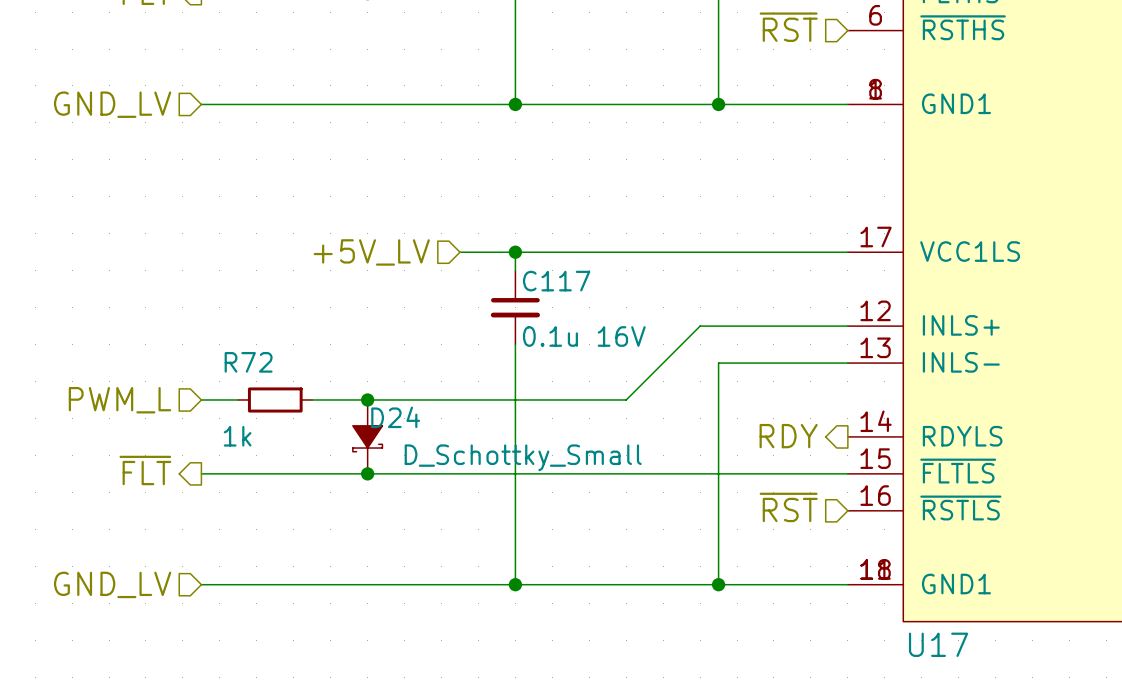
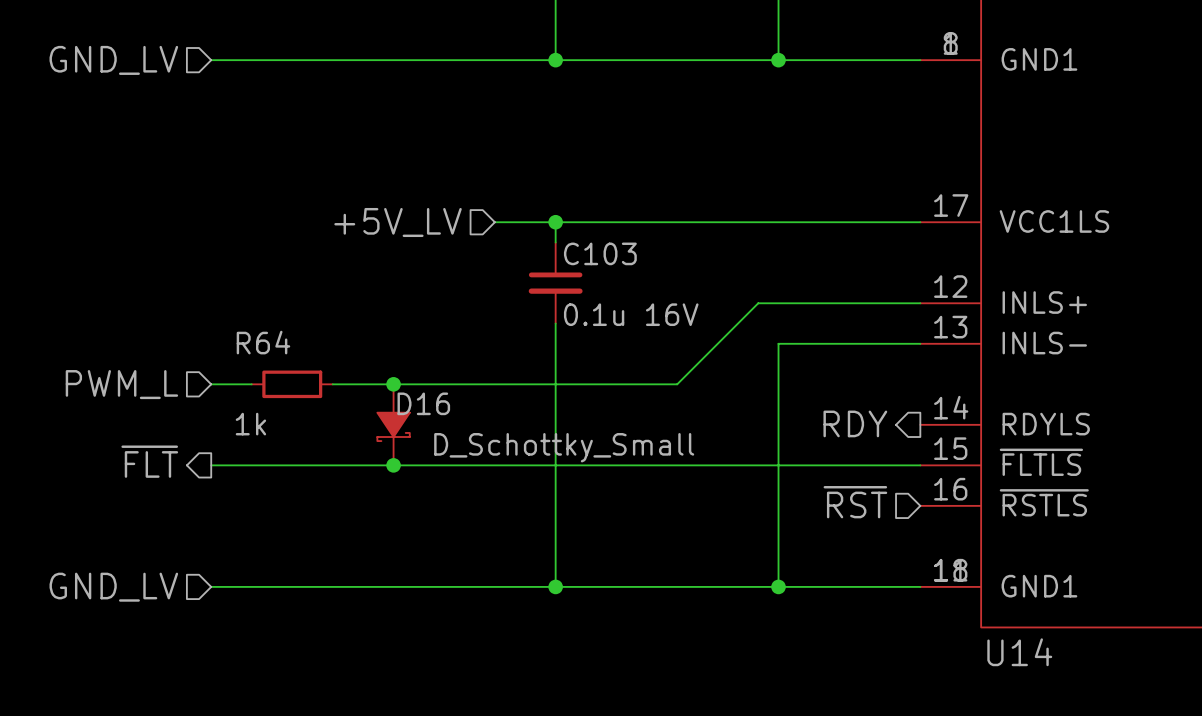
C117 name: C117 (556, 281) -> C103 (600, 253)
R72 name: R72 (248, 362) -> R64 (263, 342)
D24 name: D24 (395, 417) -> D16 (423, 403)
U17 name: U17 (938, 644) -> U14 (1019, 652)

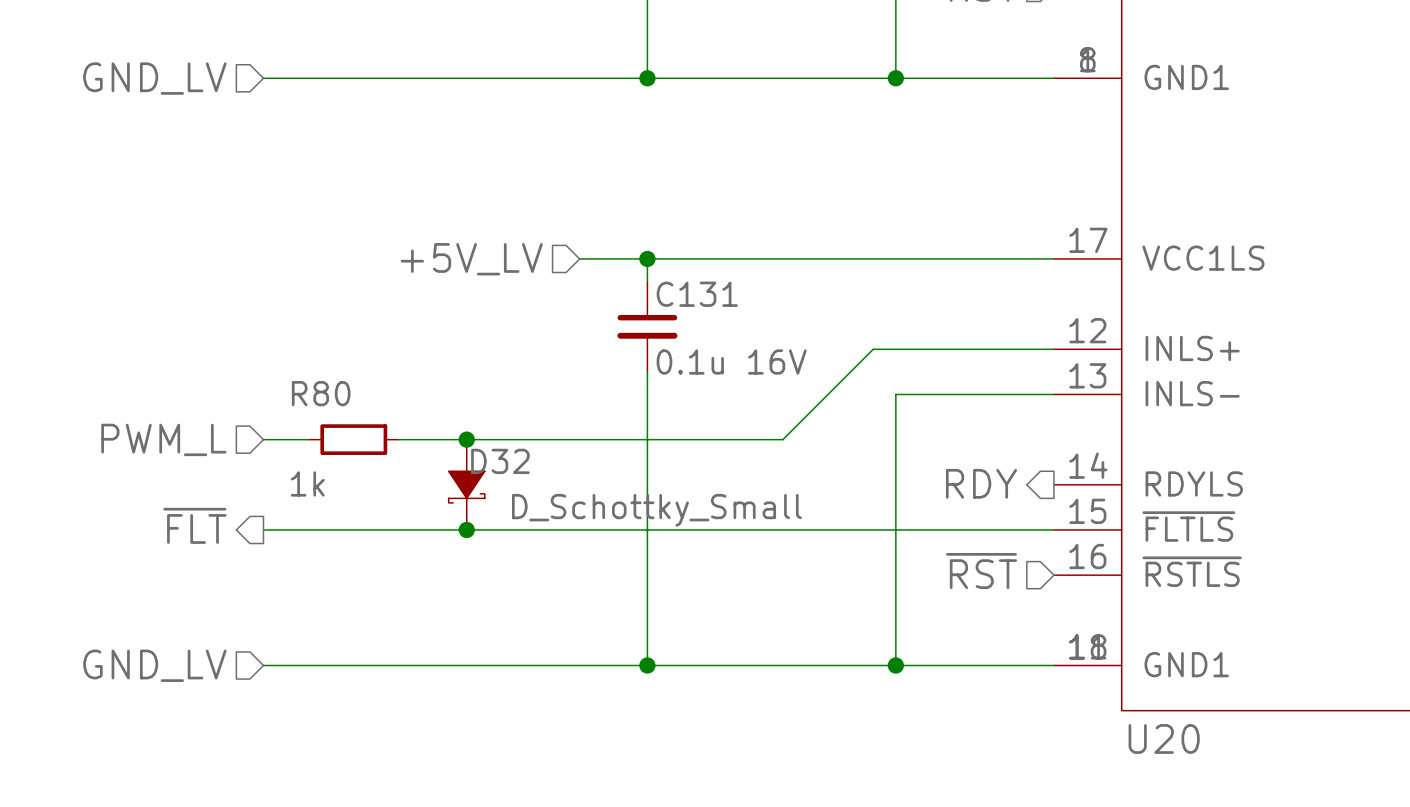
C103 name: C103 (600, 253) -> C131 (697, 294)
R64 name: R64 (263, 342) -> R80 (321, 393)
D16 name: D16 (423, 403) -> D32 (500, 461)
U14 name: U14 (1019, 652) -> U20 (1164, 738)

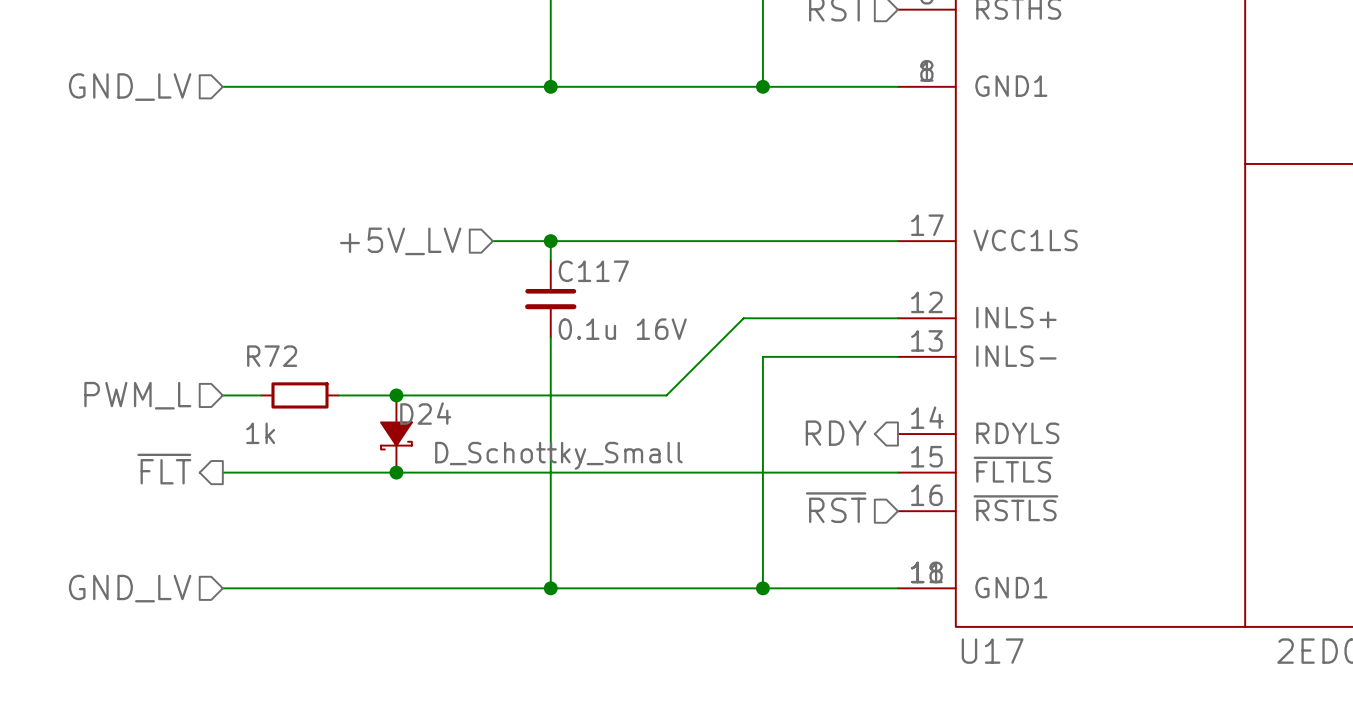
C131 name: C131 (697, 294) -> C117 (593, 271)
R80 name: R80 (321, 393) -> R72 (272, 356)
D32 name: D32 (500, 461) -> D24 (425, 413)
U20 name: U20 (1164, 738) -> U17 (992, 651)

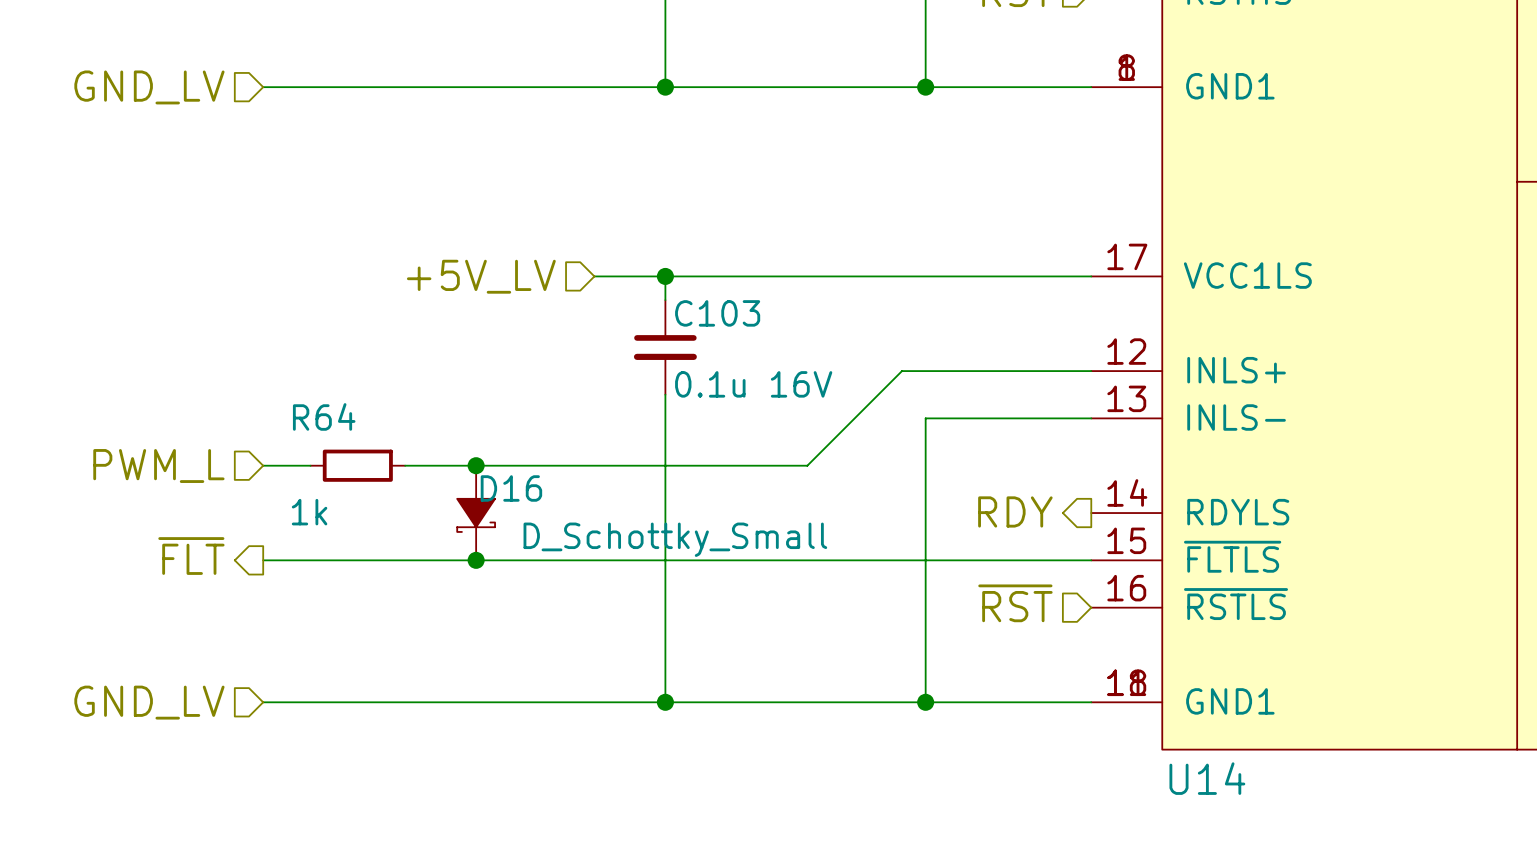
C117 name: C117 (593, 271) -> C103 (717, 313)
R72 name: R72 (272, 356) -> R64 (324, 416)
D24 name: D24 (425, 413) -> D16 (511, 488)
U17 name: U17 (992, 651) -> U14 (1207, 778)

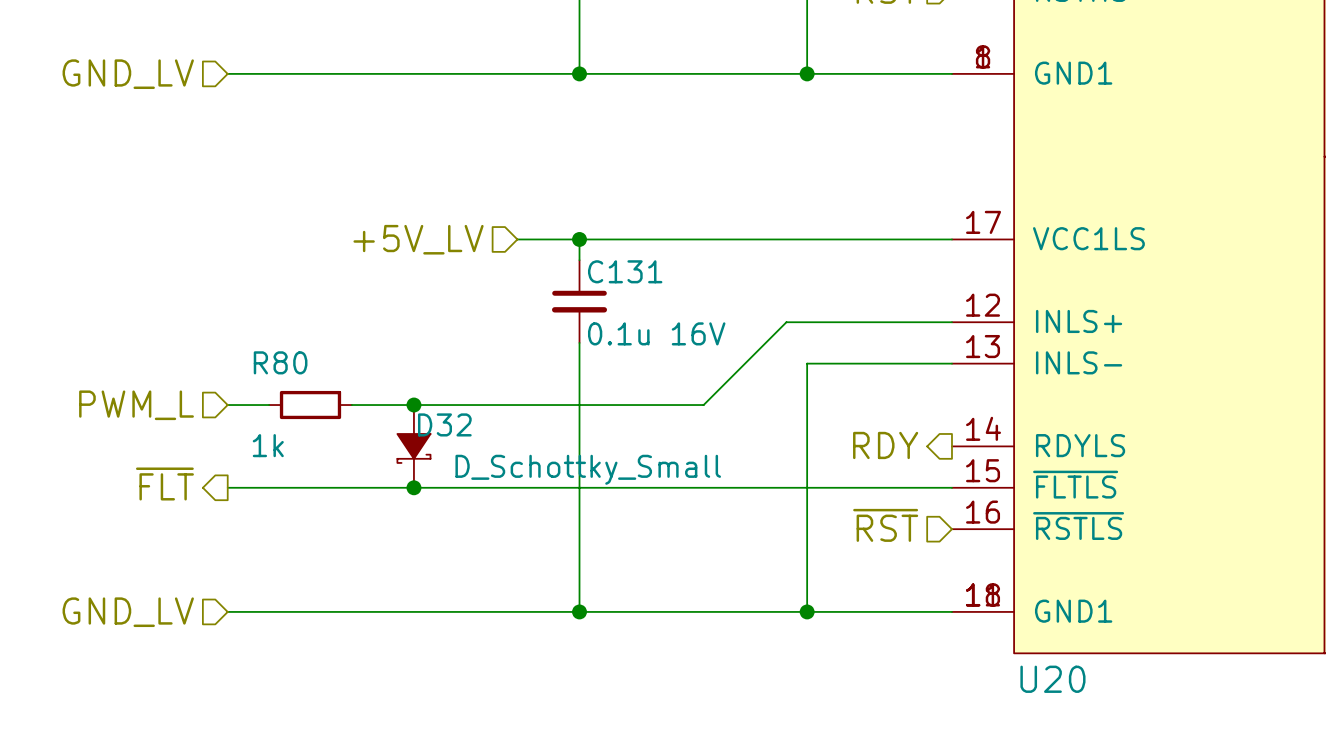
C103 name: C103 (717, 313) -> C131 (625, 271)
R64 name: R64 (324, 416) -> R80 (280, 362)
D16 name: D16 (511, 488) -> D32 (444, 424)
U14 name: U14 (1207, 778) -> U20 (1052, 679)

